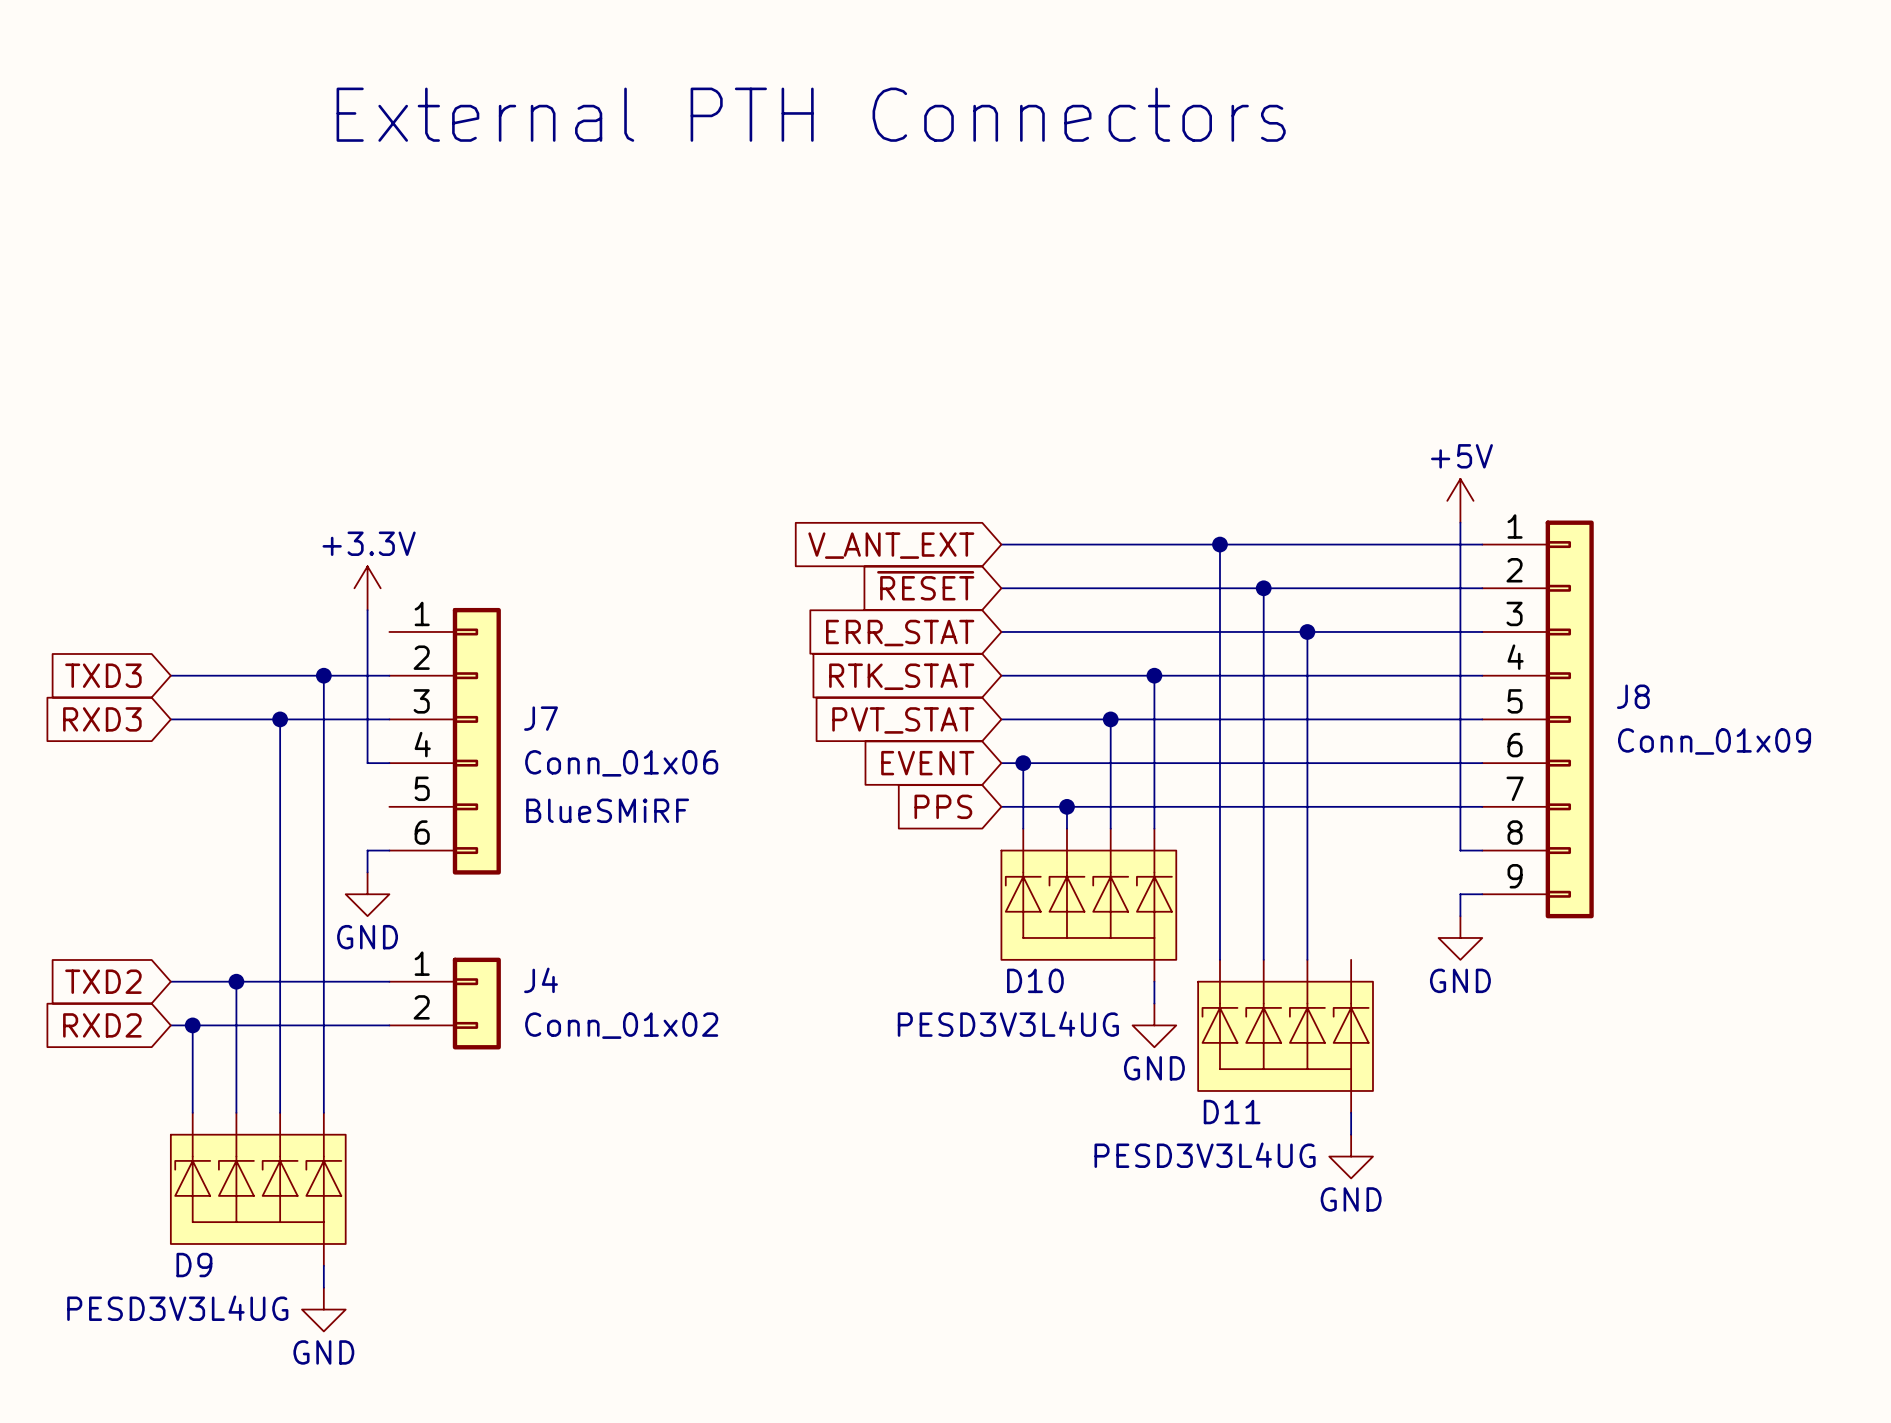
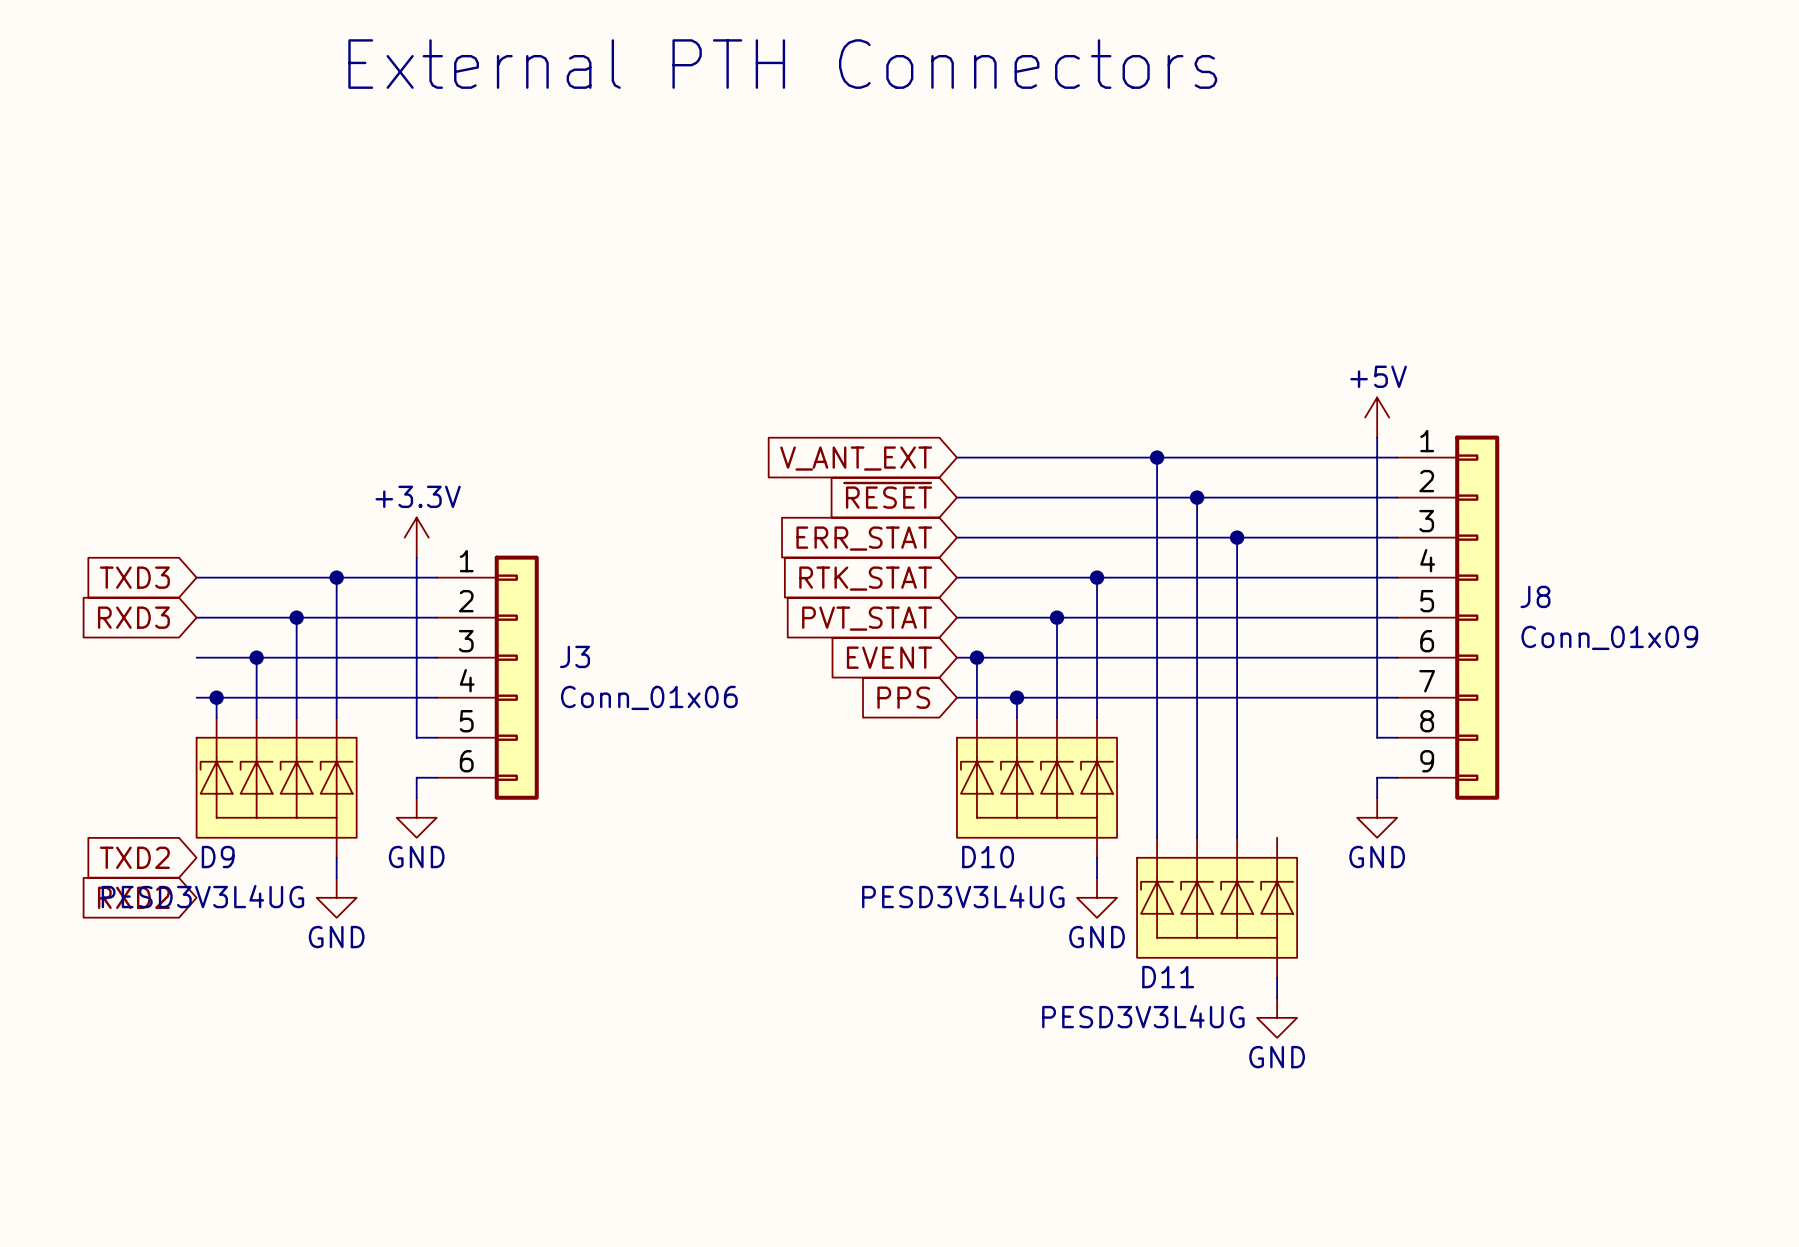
power symbol position: +3.3V (367, 588) -> +3.3V (416, 537)
wire: (367, 610) (367, 763) -> (196, 657) (376, 657)
wire: none -> (416, 557) (416, 737) (436, 737)
J7: Conn_01x06 (445, 741) -> none
wire: none -> (256, 657) (256, 717)
junction: none -> (256, 657)
J3: none -> Conn_01x06 (487, 677)
wire: none -> (196, 697) (436, 697)
wire: none -> (216, 697) (216, 717)
junction: none -> (216, 697)
text: BlueSMiRF (607, 810) -> none
wire: (280, 828) (280, 1112) -> none
wire: (389, 850) (367, 850) (367, 872) -> (436, 777) (416, 777) (416, 797)
power symbol position: GND (367, 894) -> GND (416, 817)
wire: (170, 981) (389, 981) -> none
wire: (236, 981) (236, 1112) -> none
junction: (236, 981) -> none
wire: (323, 1003) (323, 1112) -> none
J4: Conn_01x02 (445, 1003) -> none
wire: (170, 1025) (389, 1025) -> none
wire: (192, 1025) (192, 1112) -> none
junction: (192, 1025) -> none
power symbol: none -> GND (336, 897)
D9 position: (258, 1189) -> (276, 787)
wire: (323, 1265) (323, 1287) -> none
power symbol: GND (323, 1309) -> none

